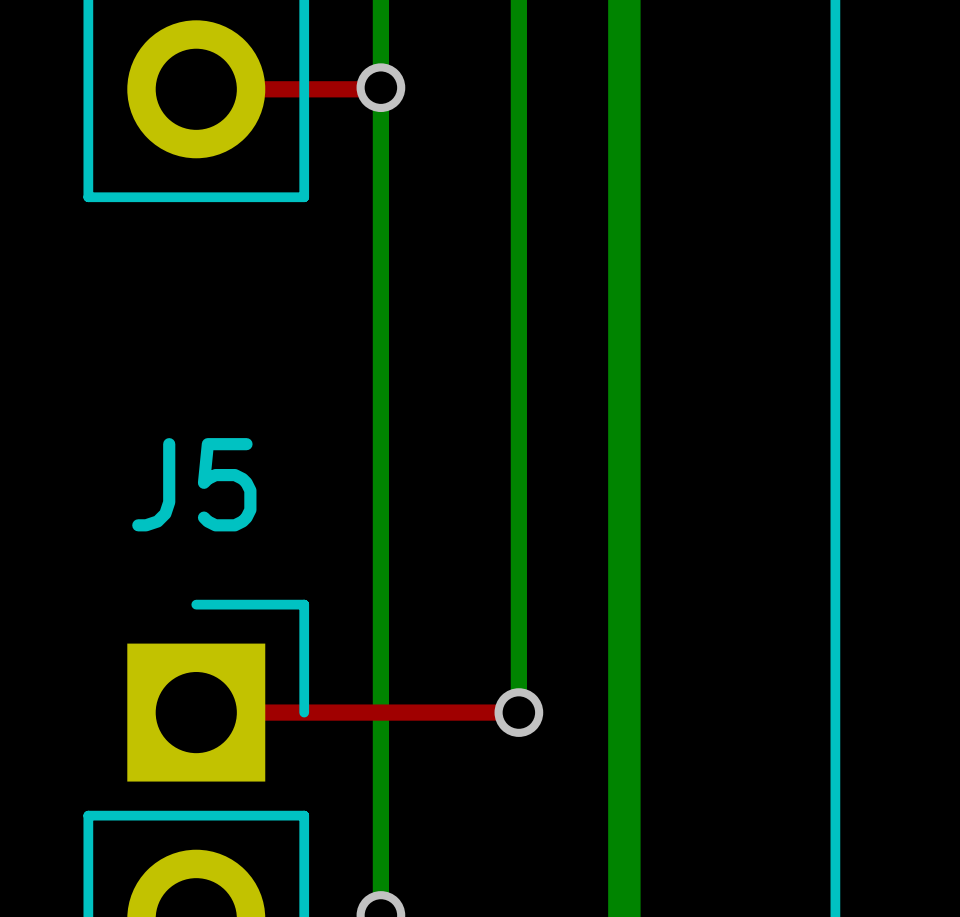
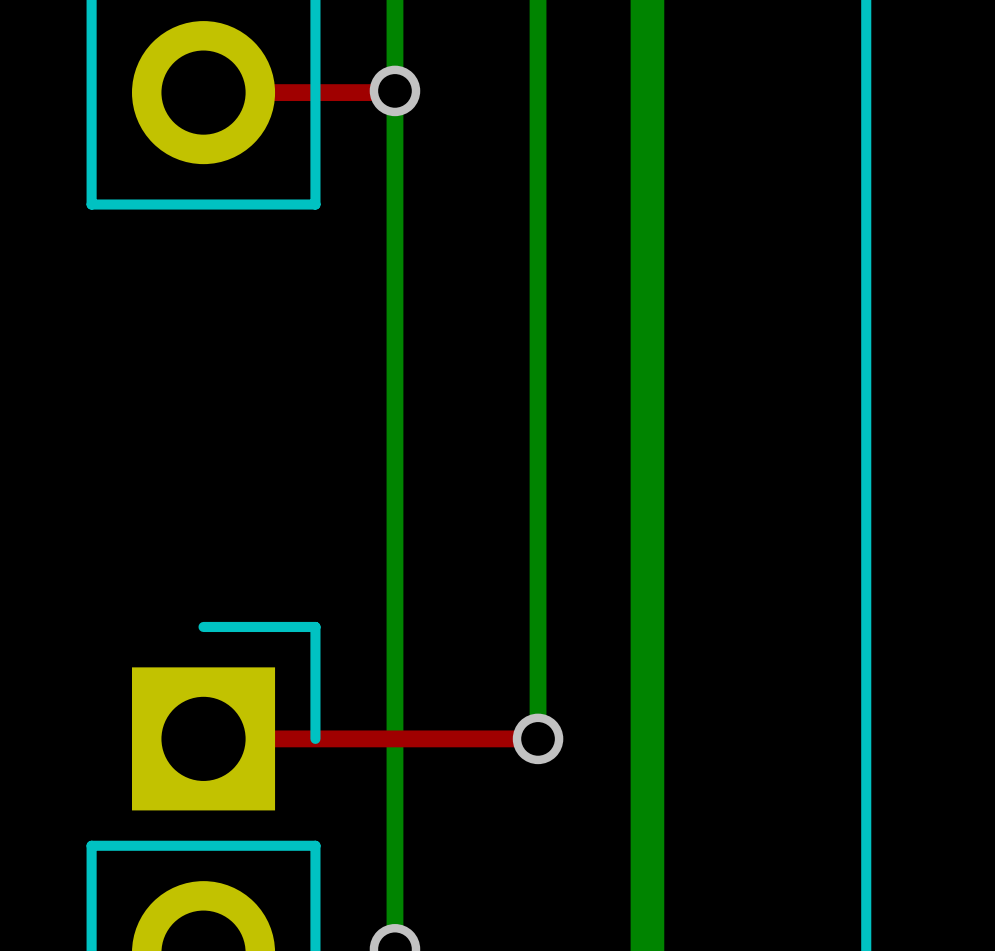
J5 name: J5 (194, 484) -> none

